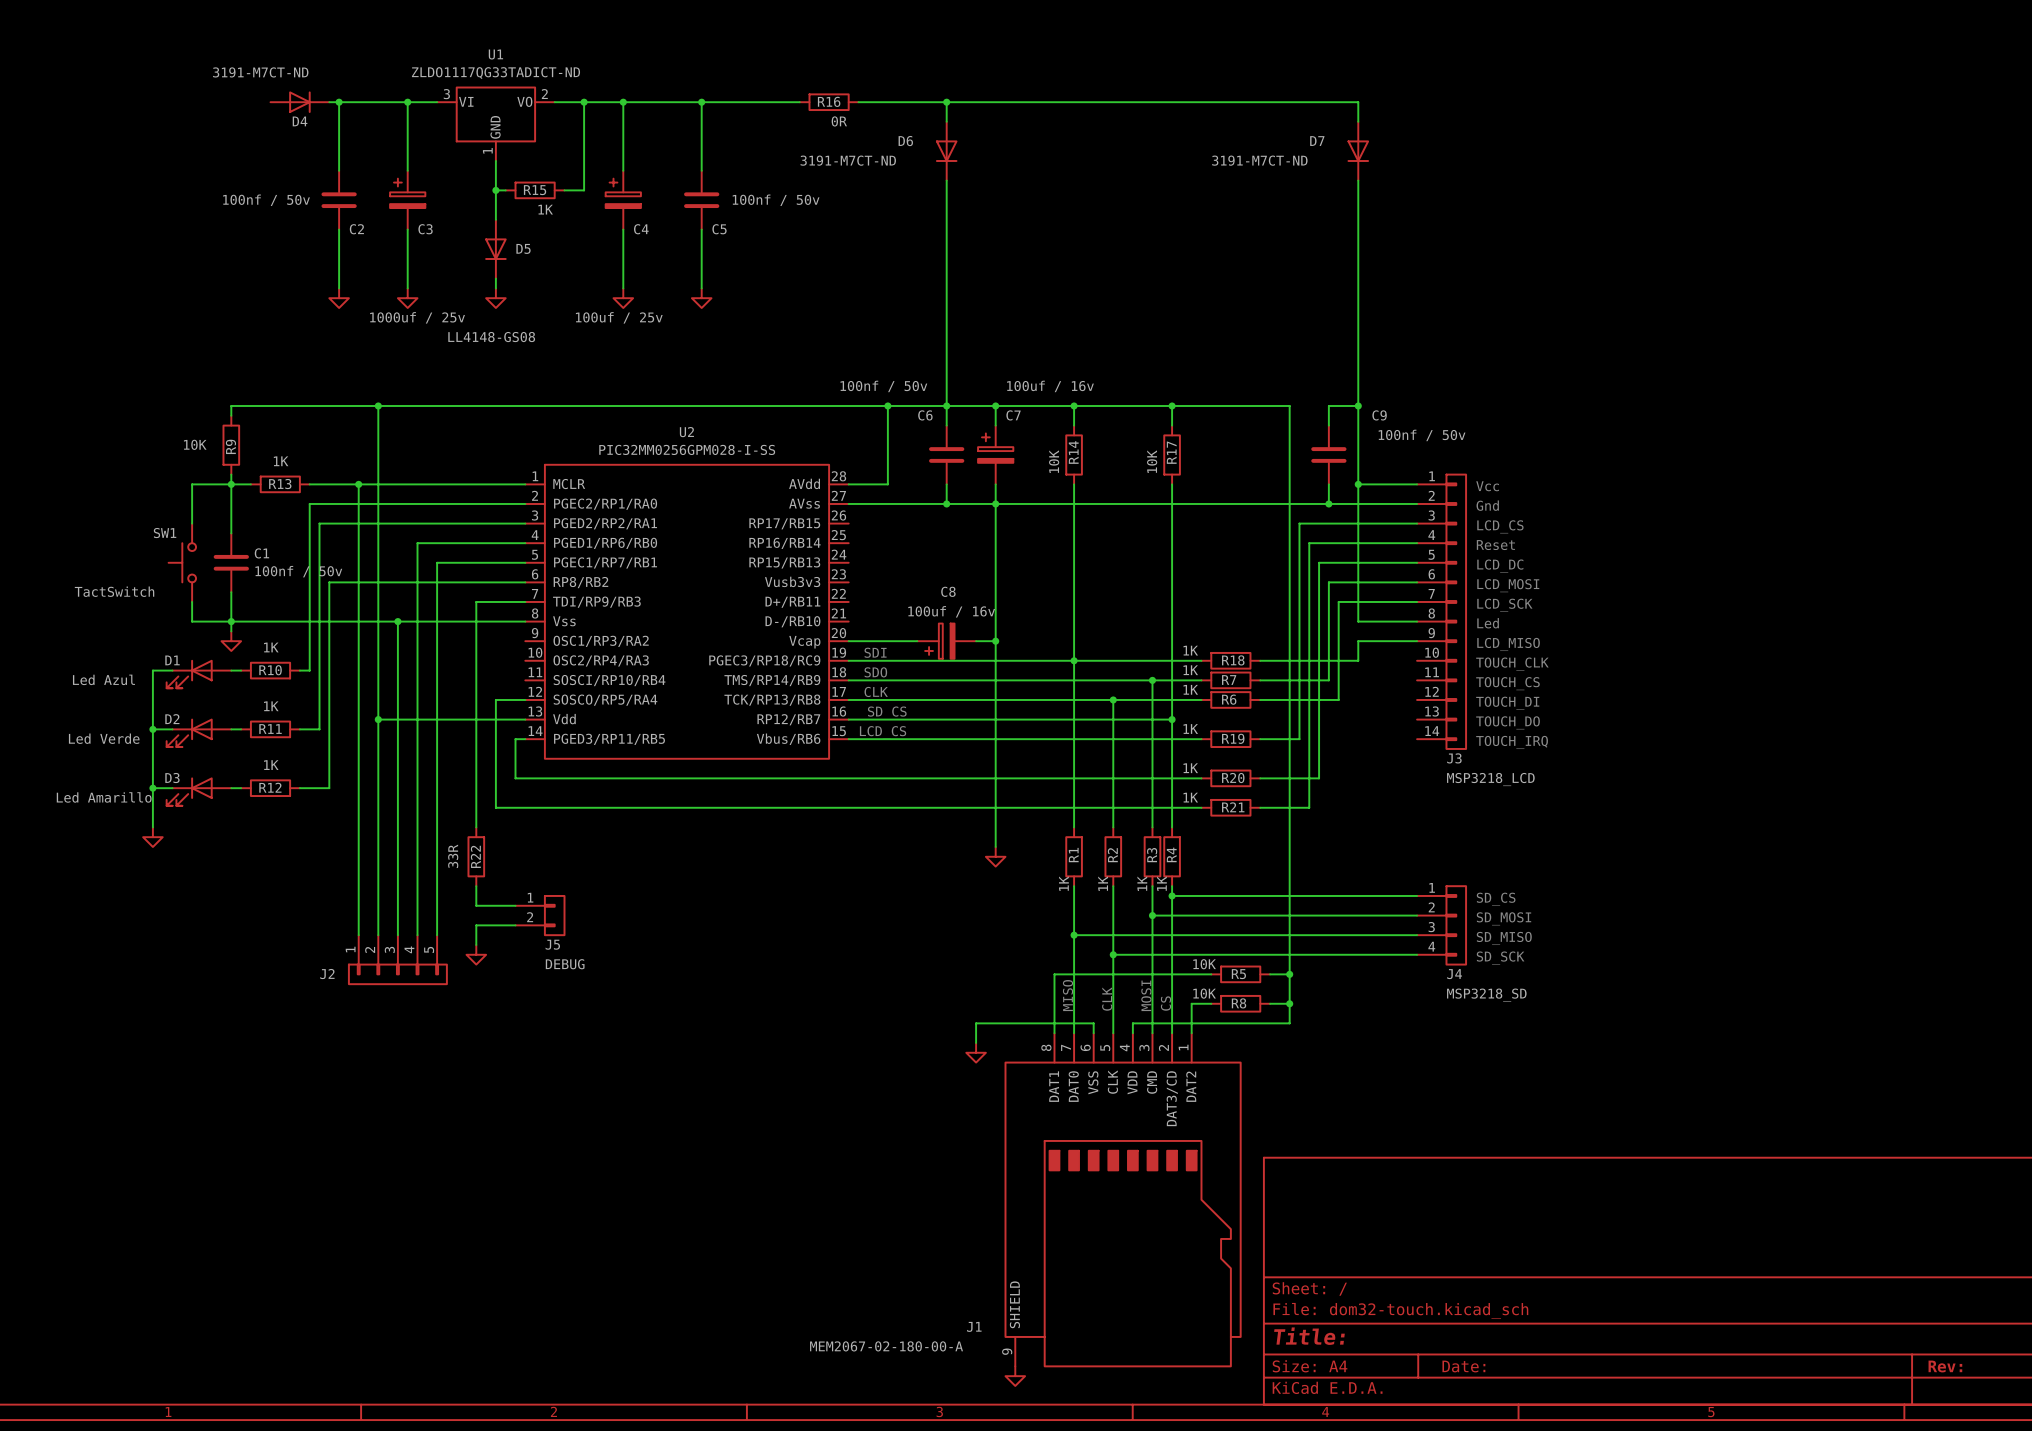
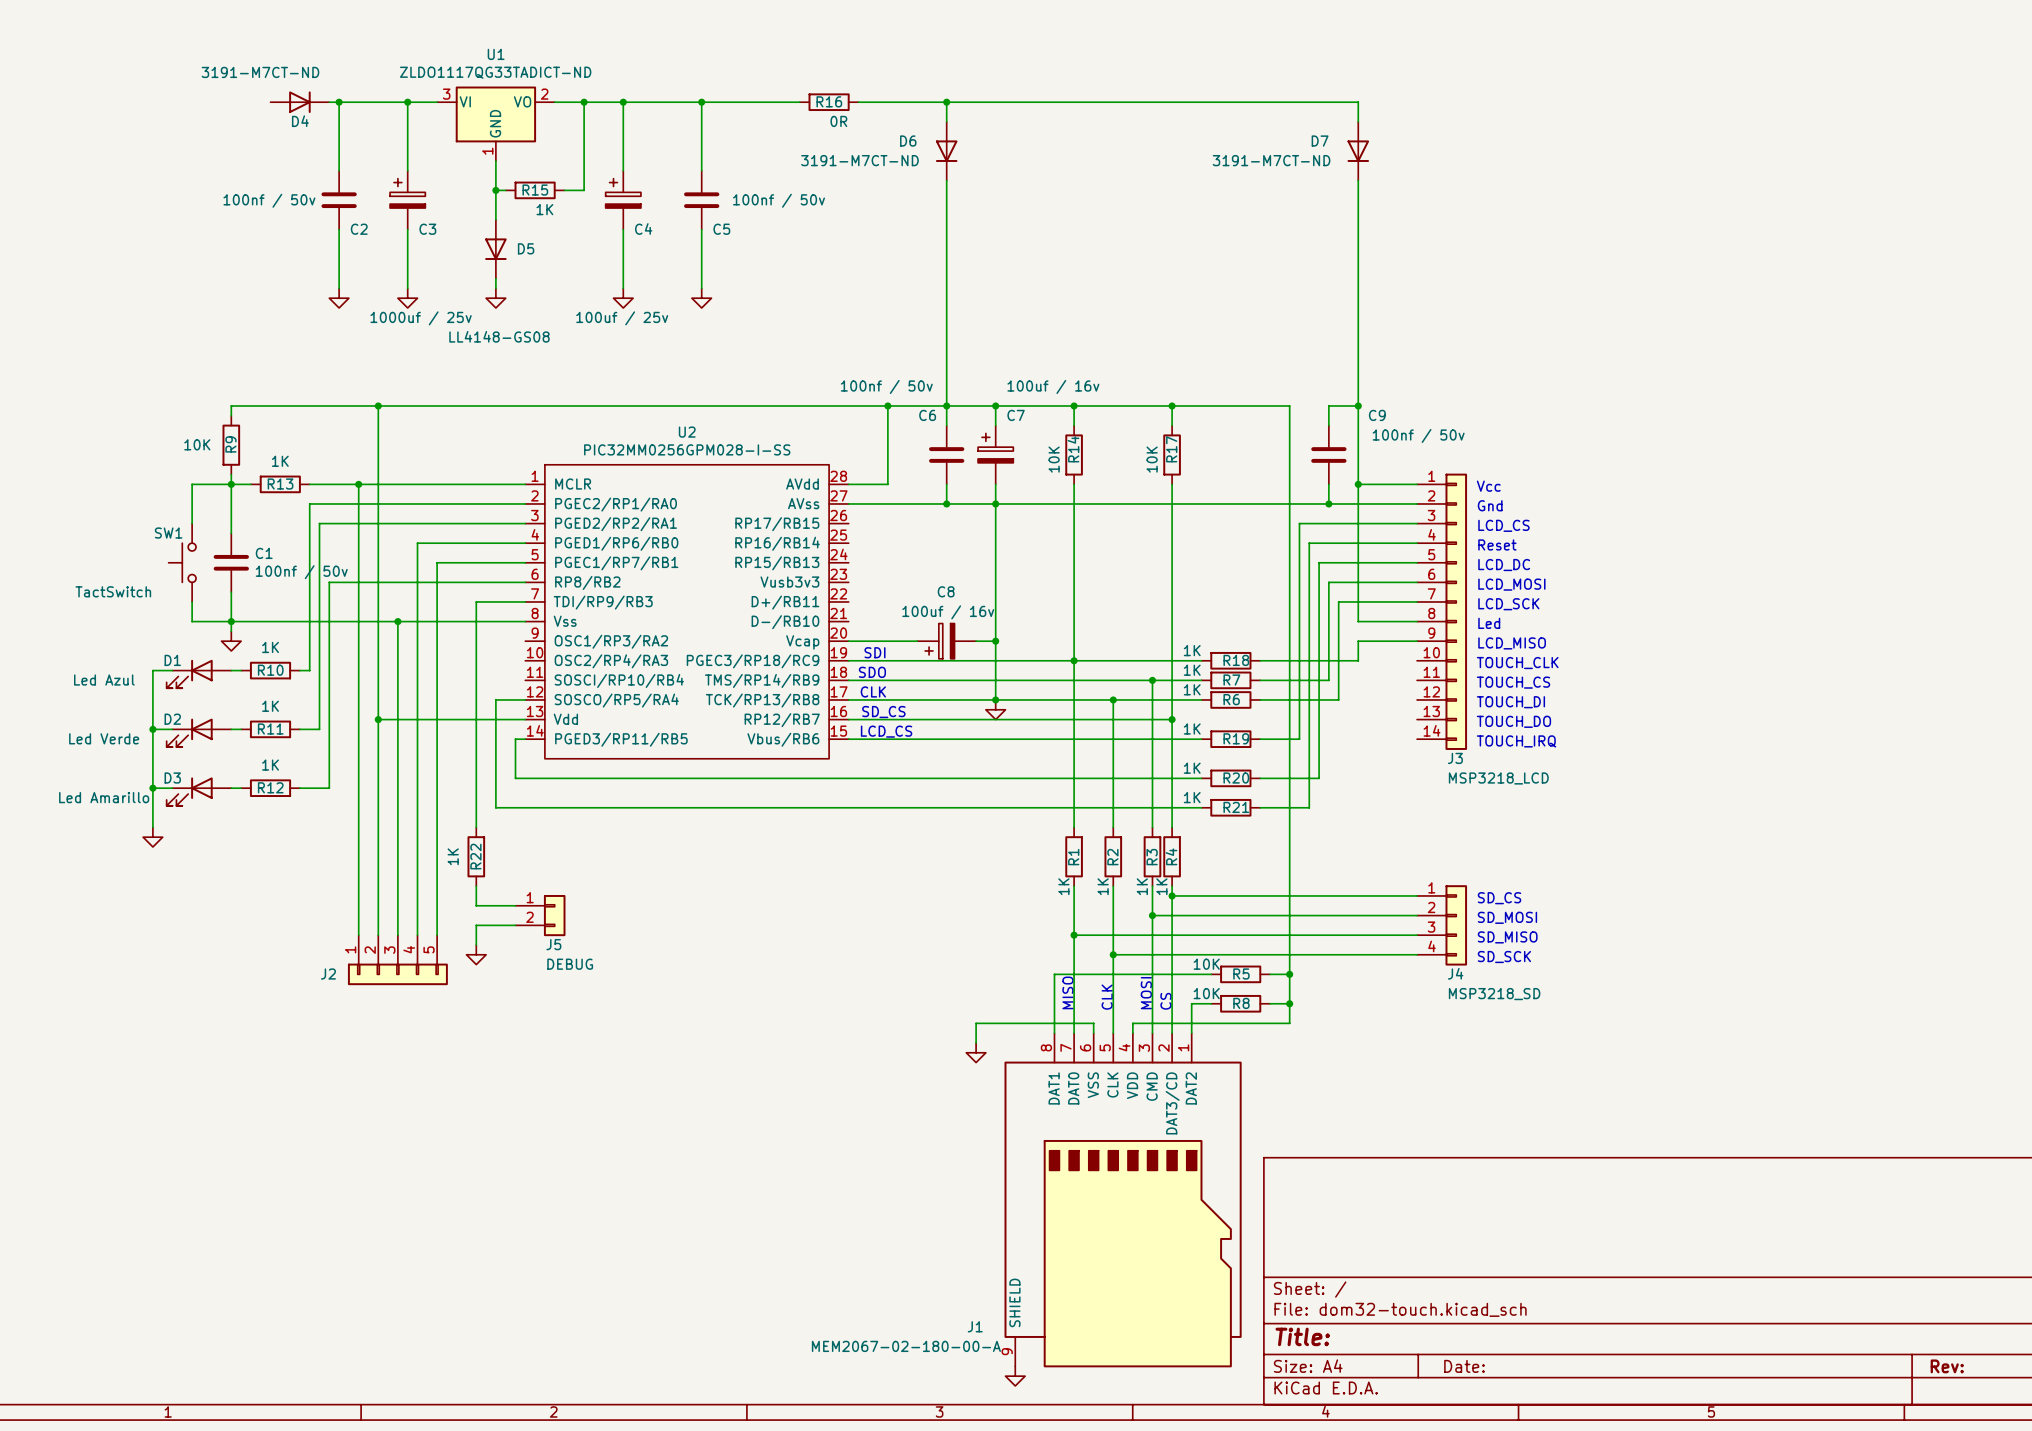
wire: (995, 699) (995, 846) -> none
junction: none -> (995, 699)
R22 value: 33R (453, 856) -> 1K (453, 856)
power symbol position: (995, 856) -> (995, 709)

